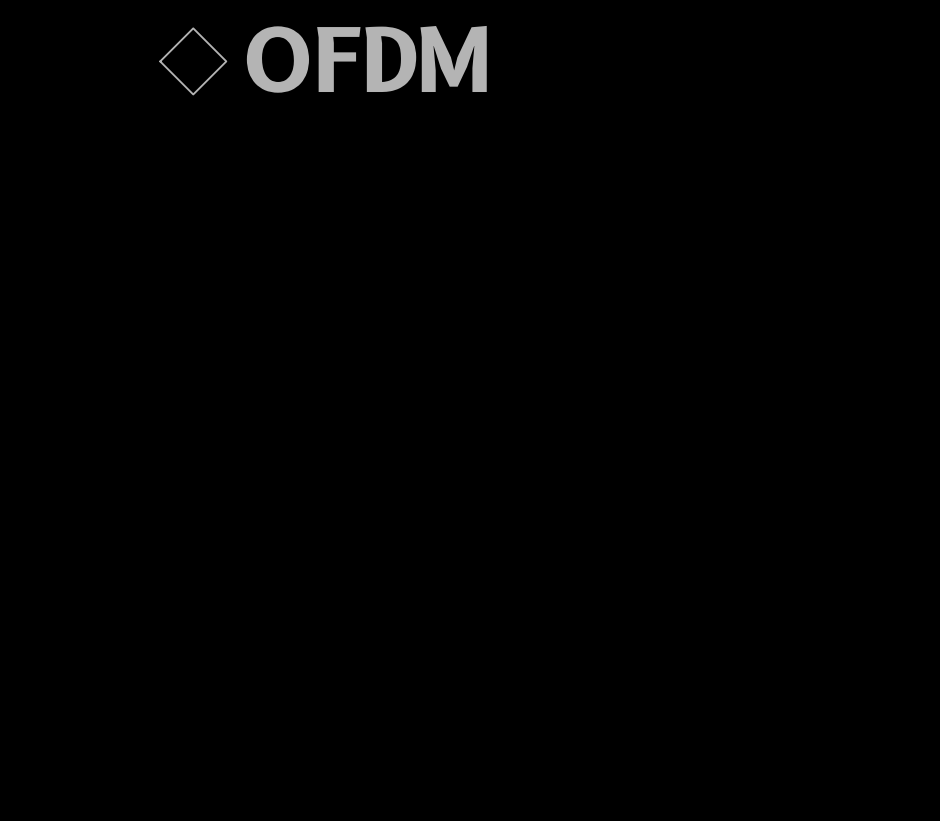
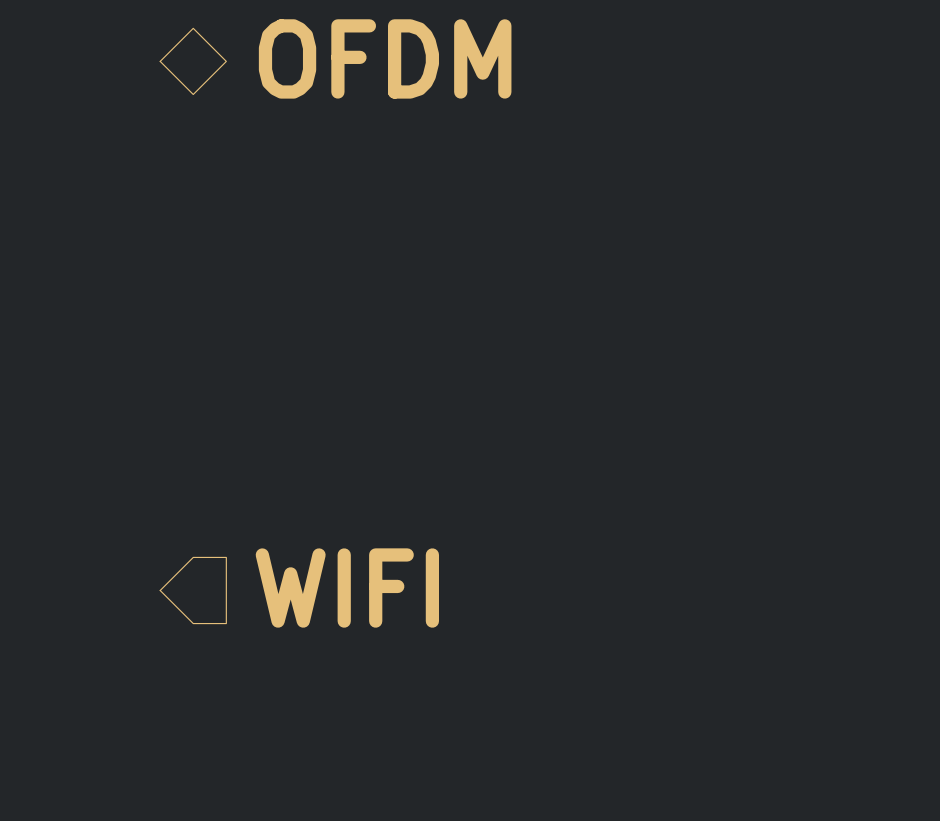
hierarchical label: none -> WIFI (347, 588)

